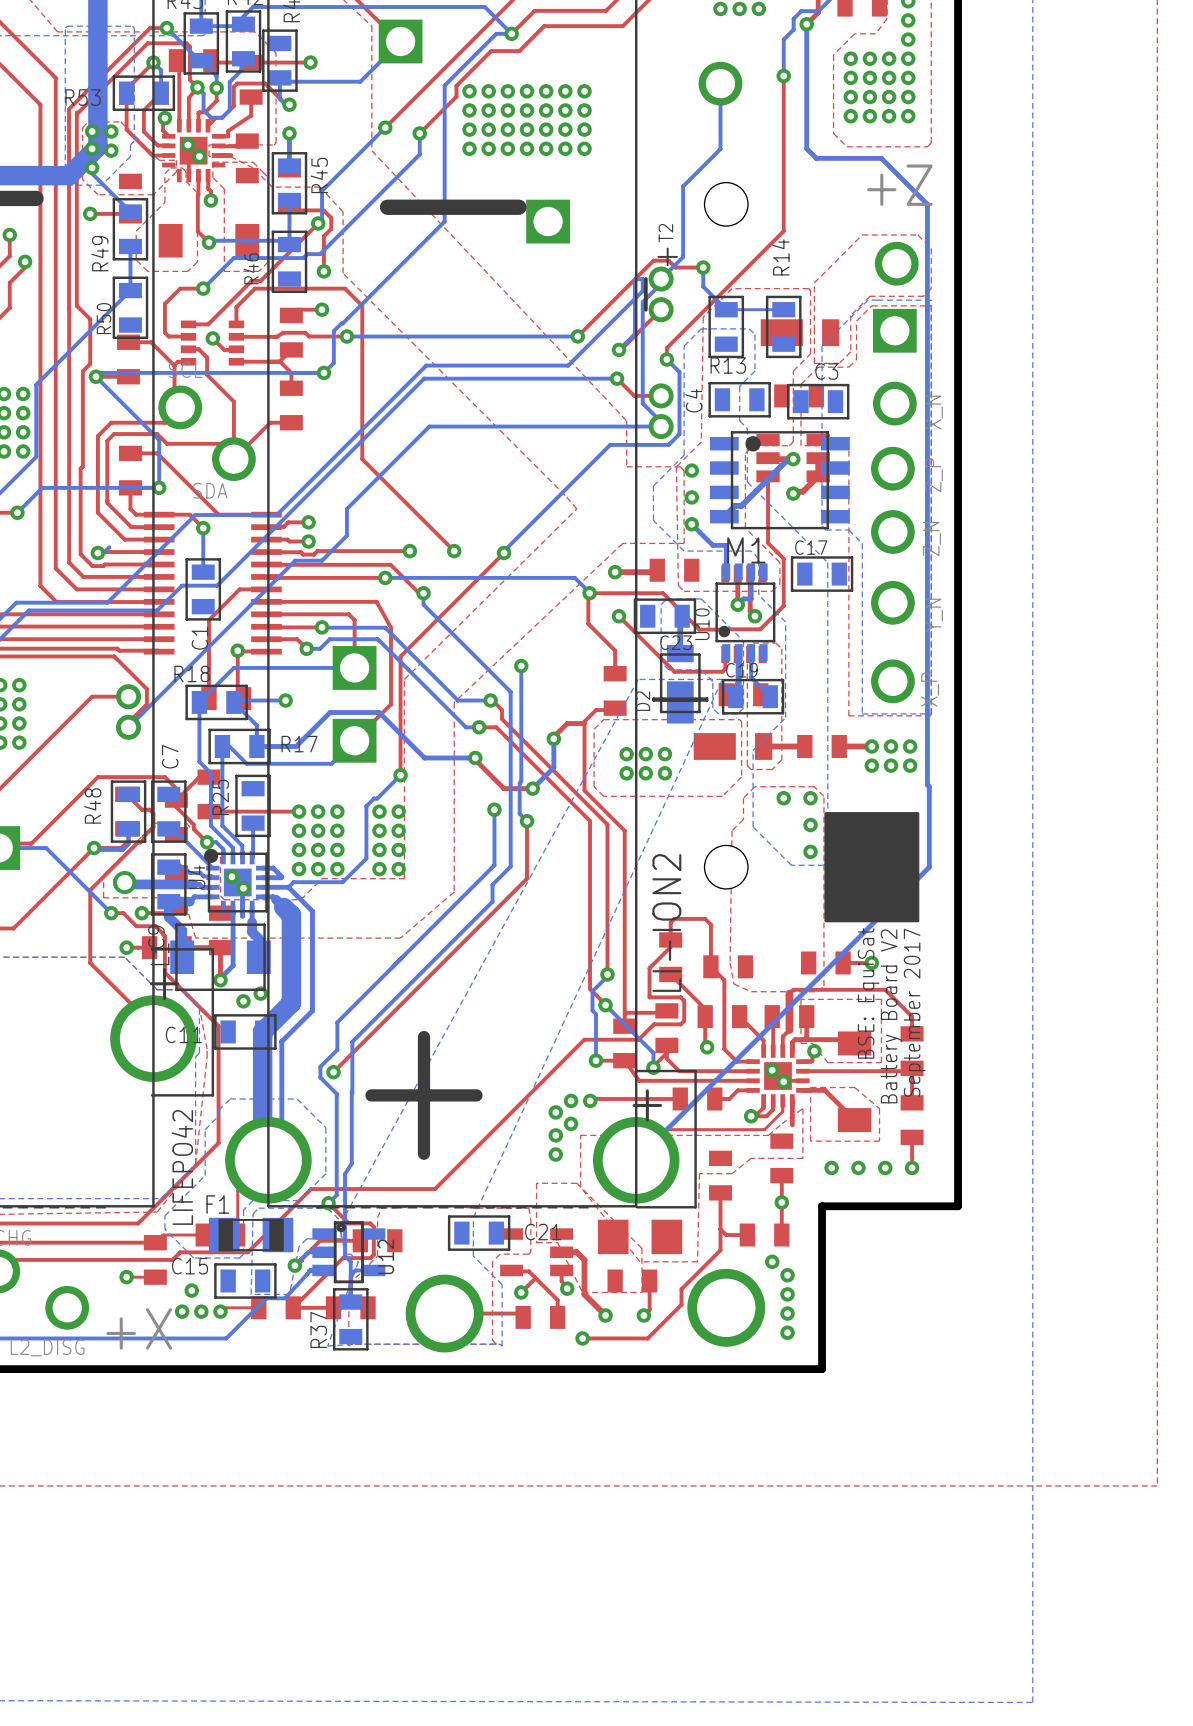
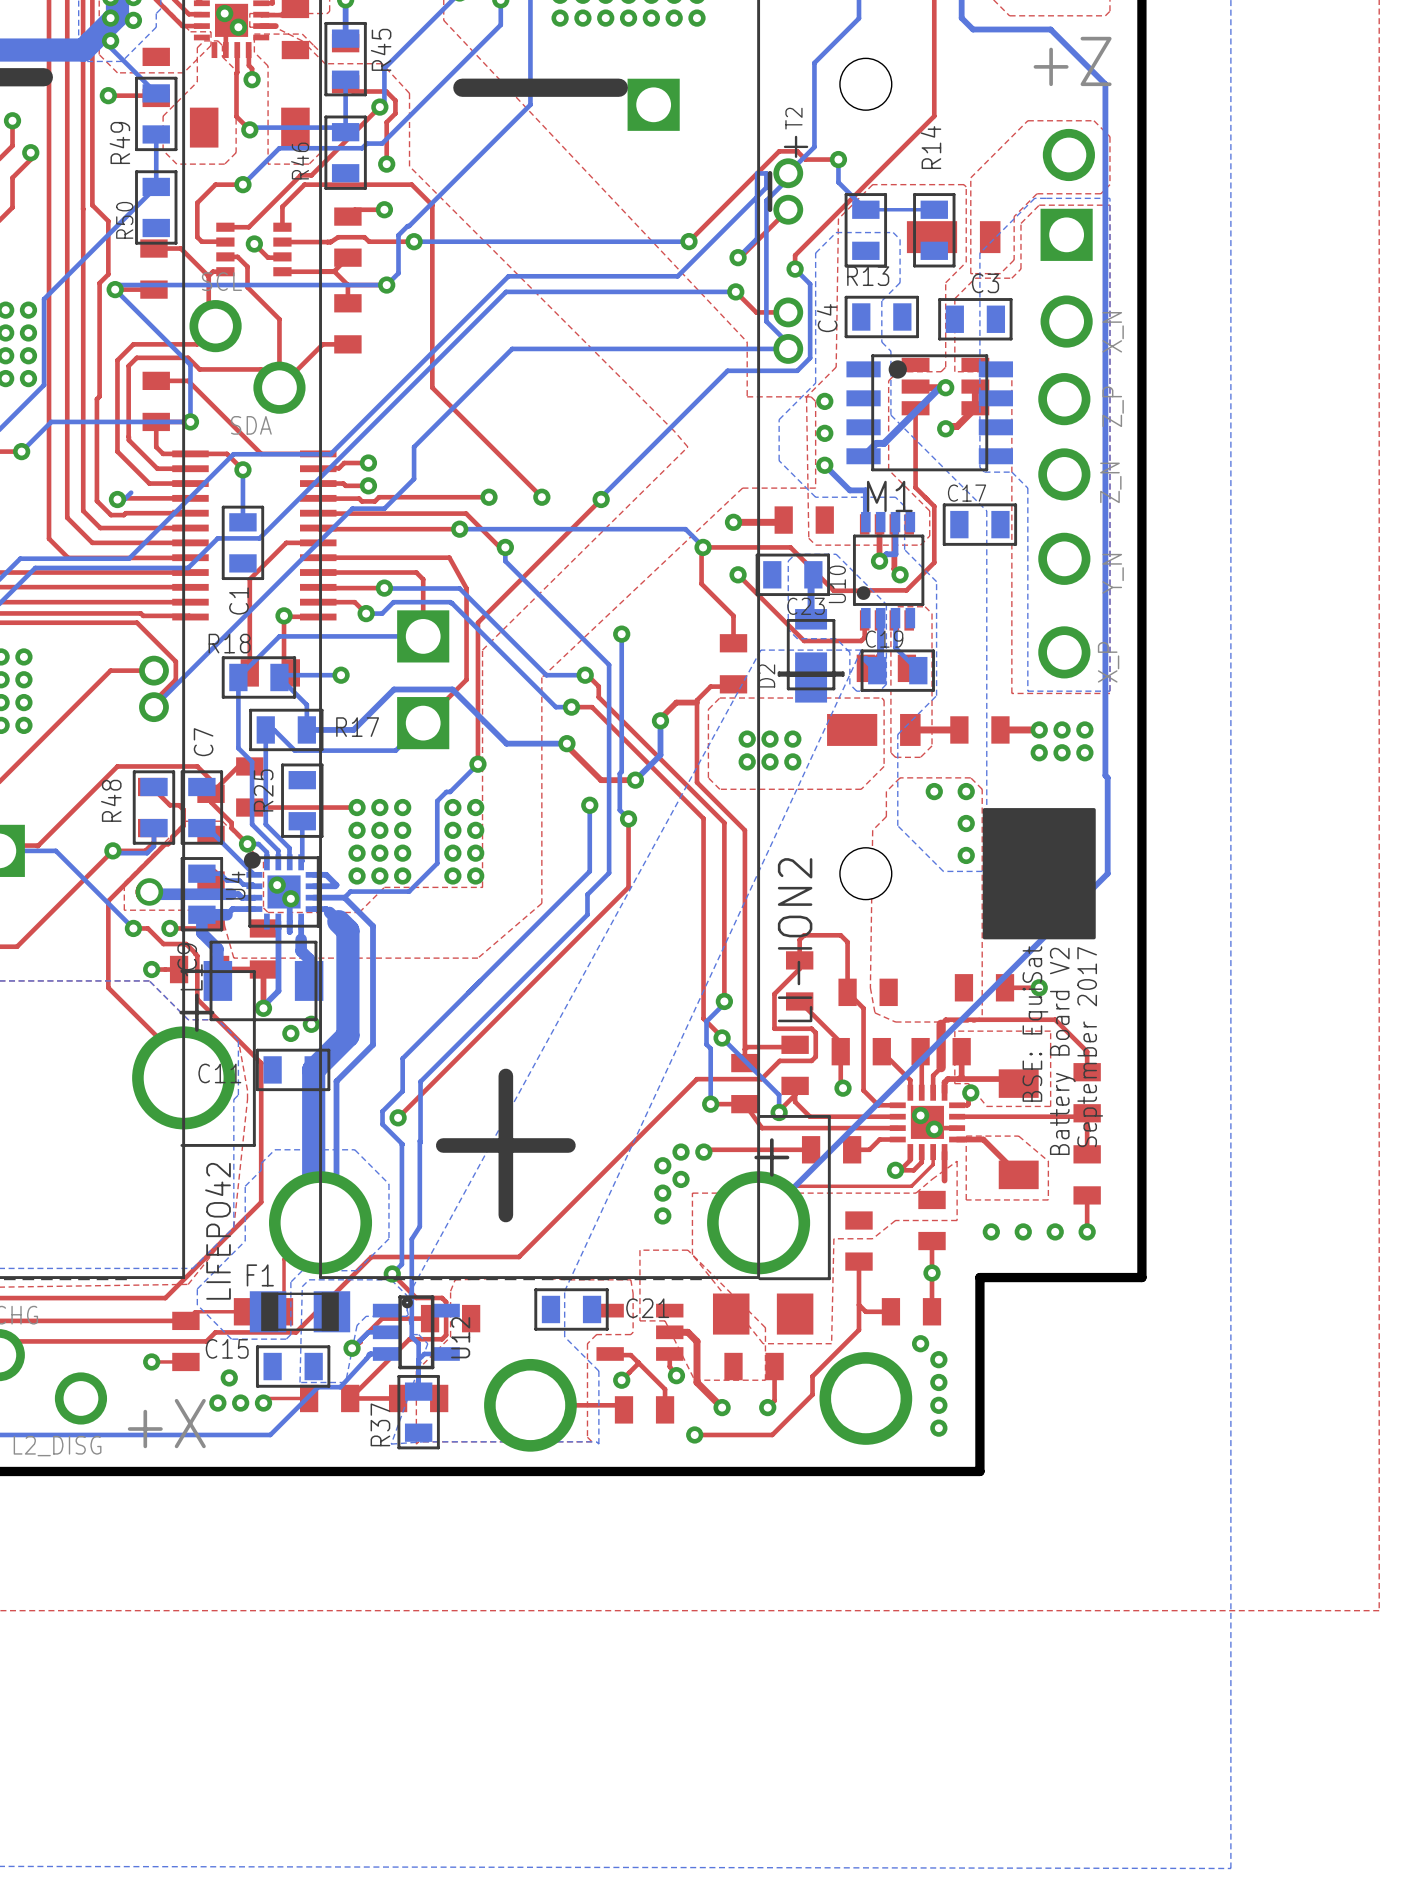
part: (799, 395) -> none

